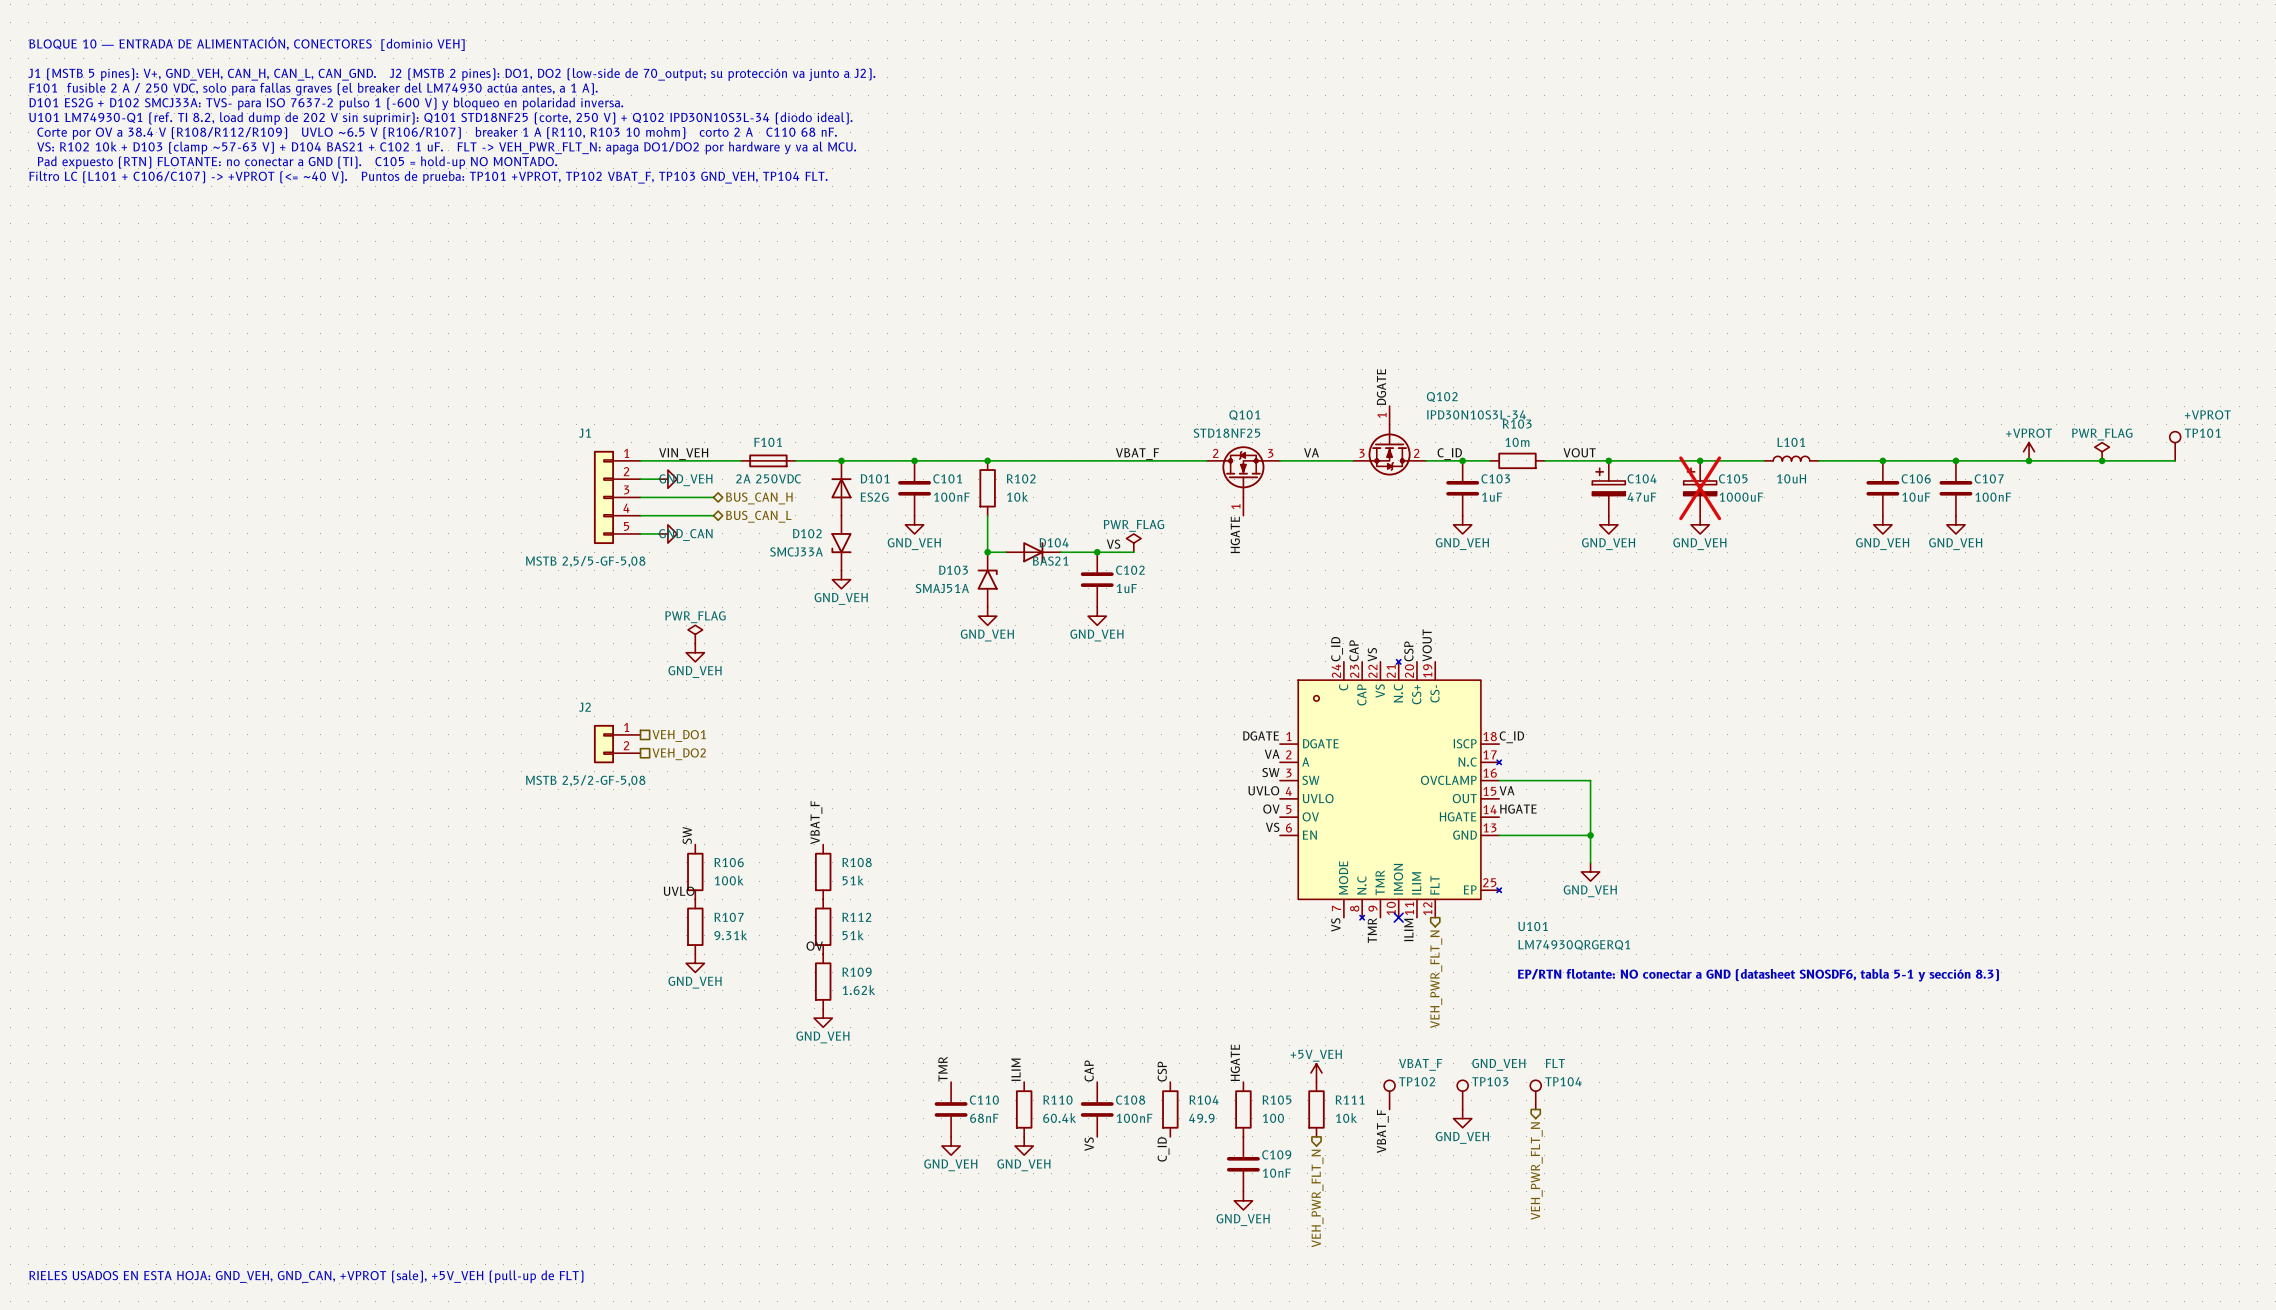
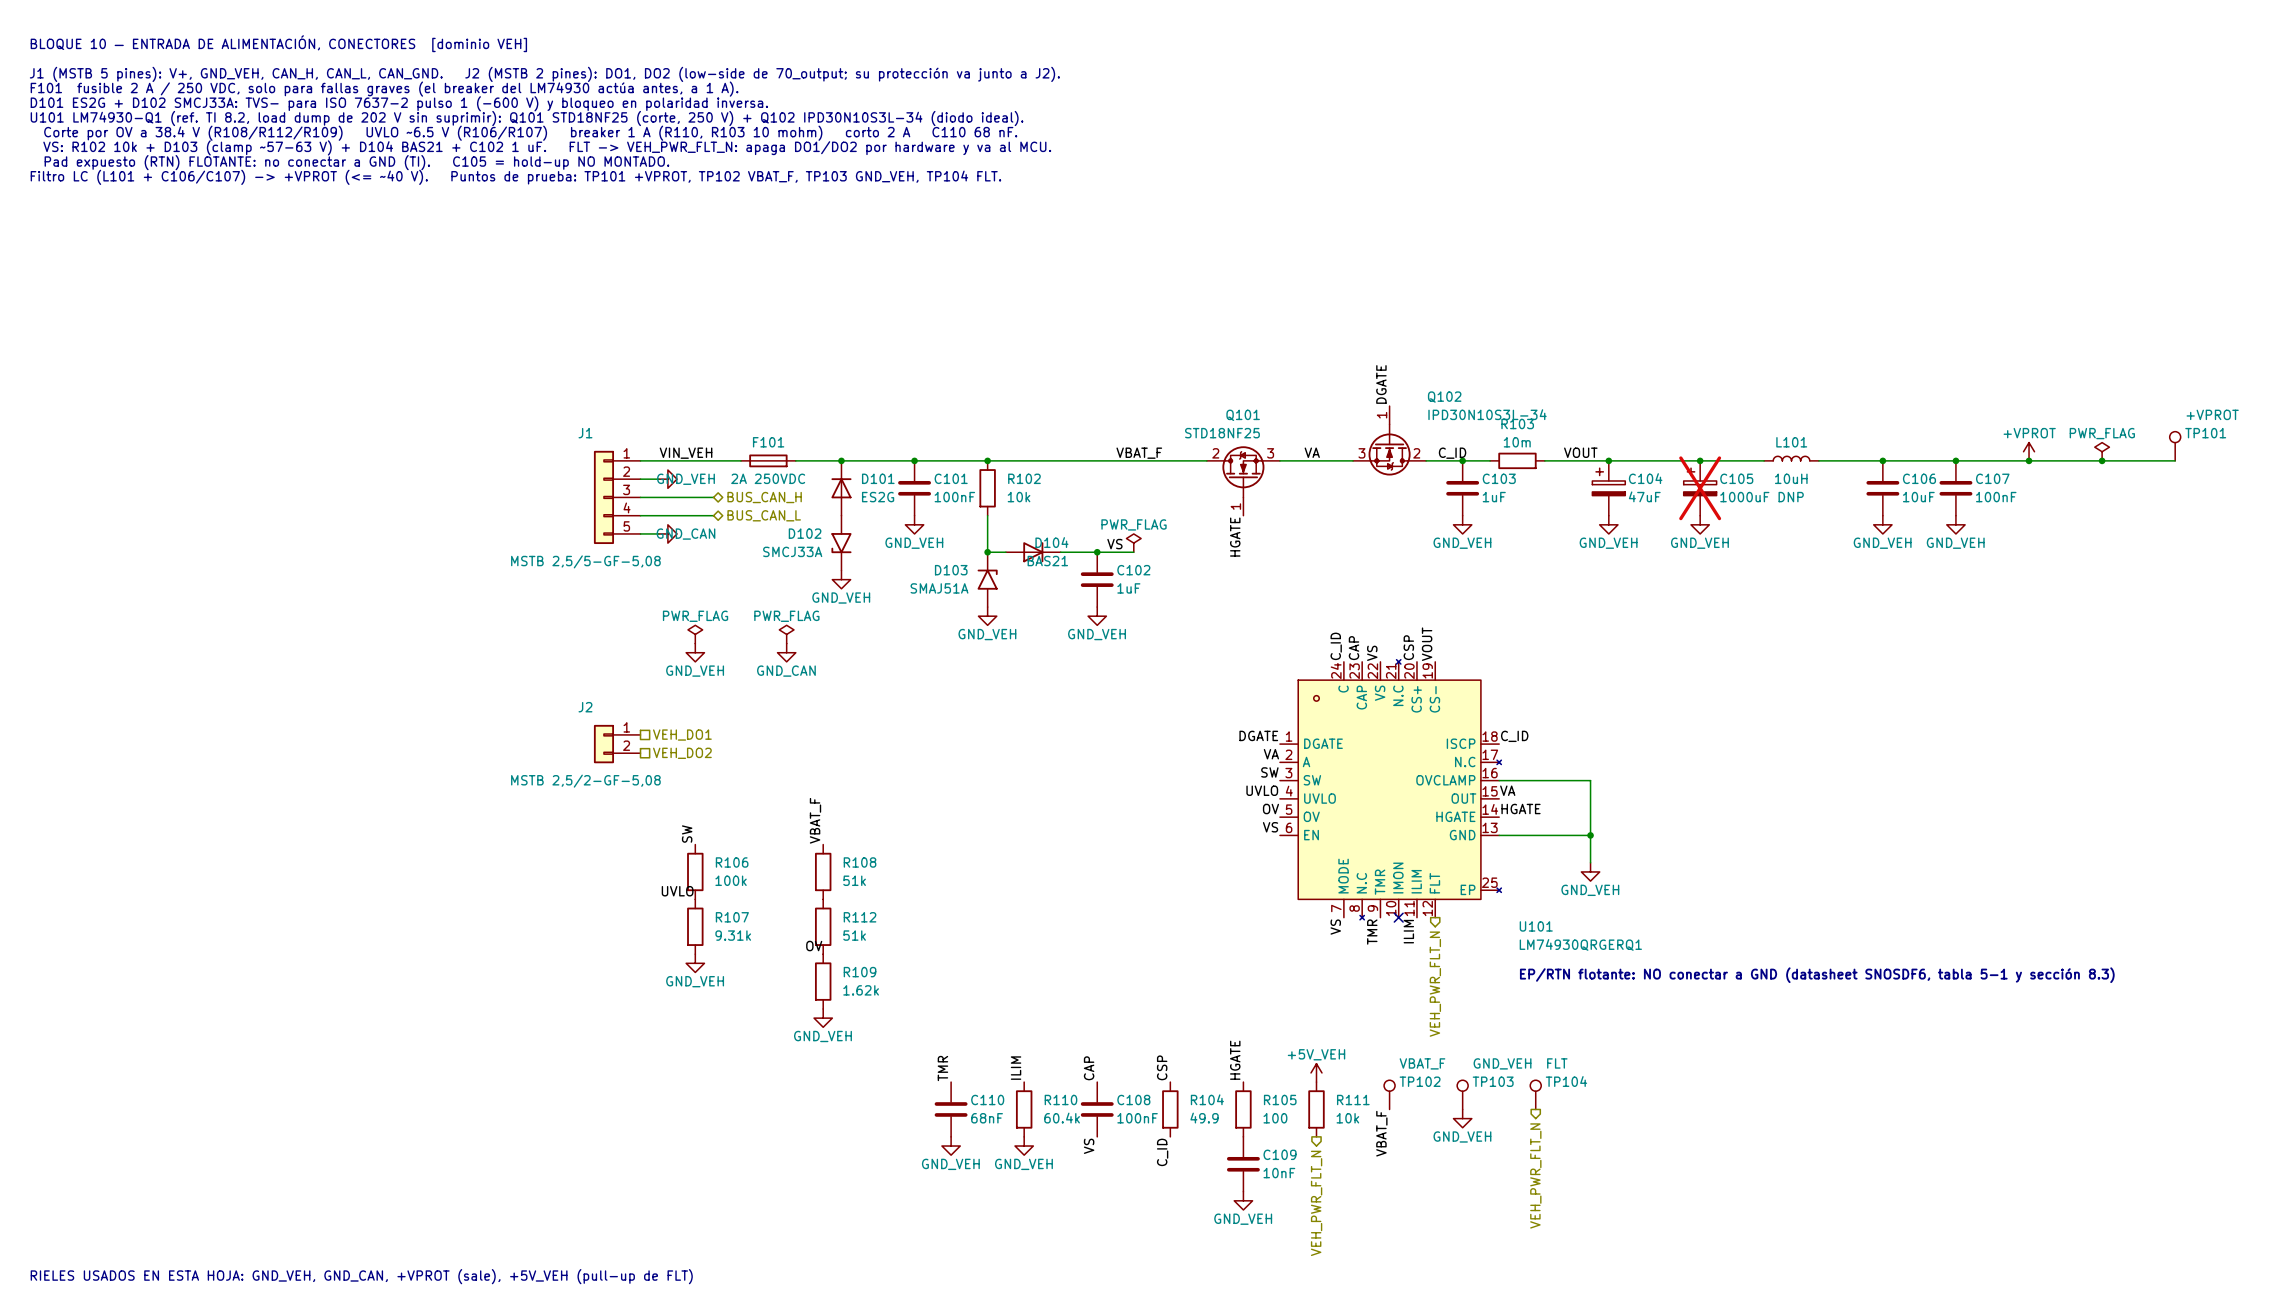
C105 value: 1000uF (1741, 497) -> 1000uF DNP (1762, 497)
power symbol: none -> PWR_FLAG (786, 634)
power symbol: none -> GND_CAN (786, 652)

